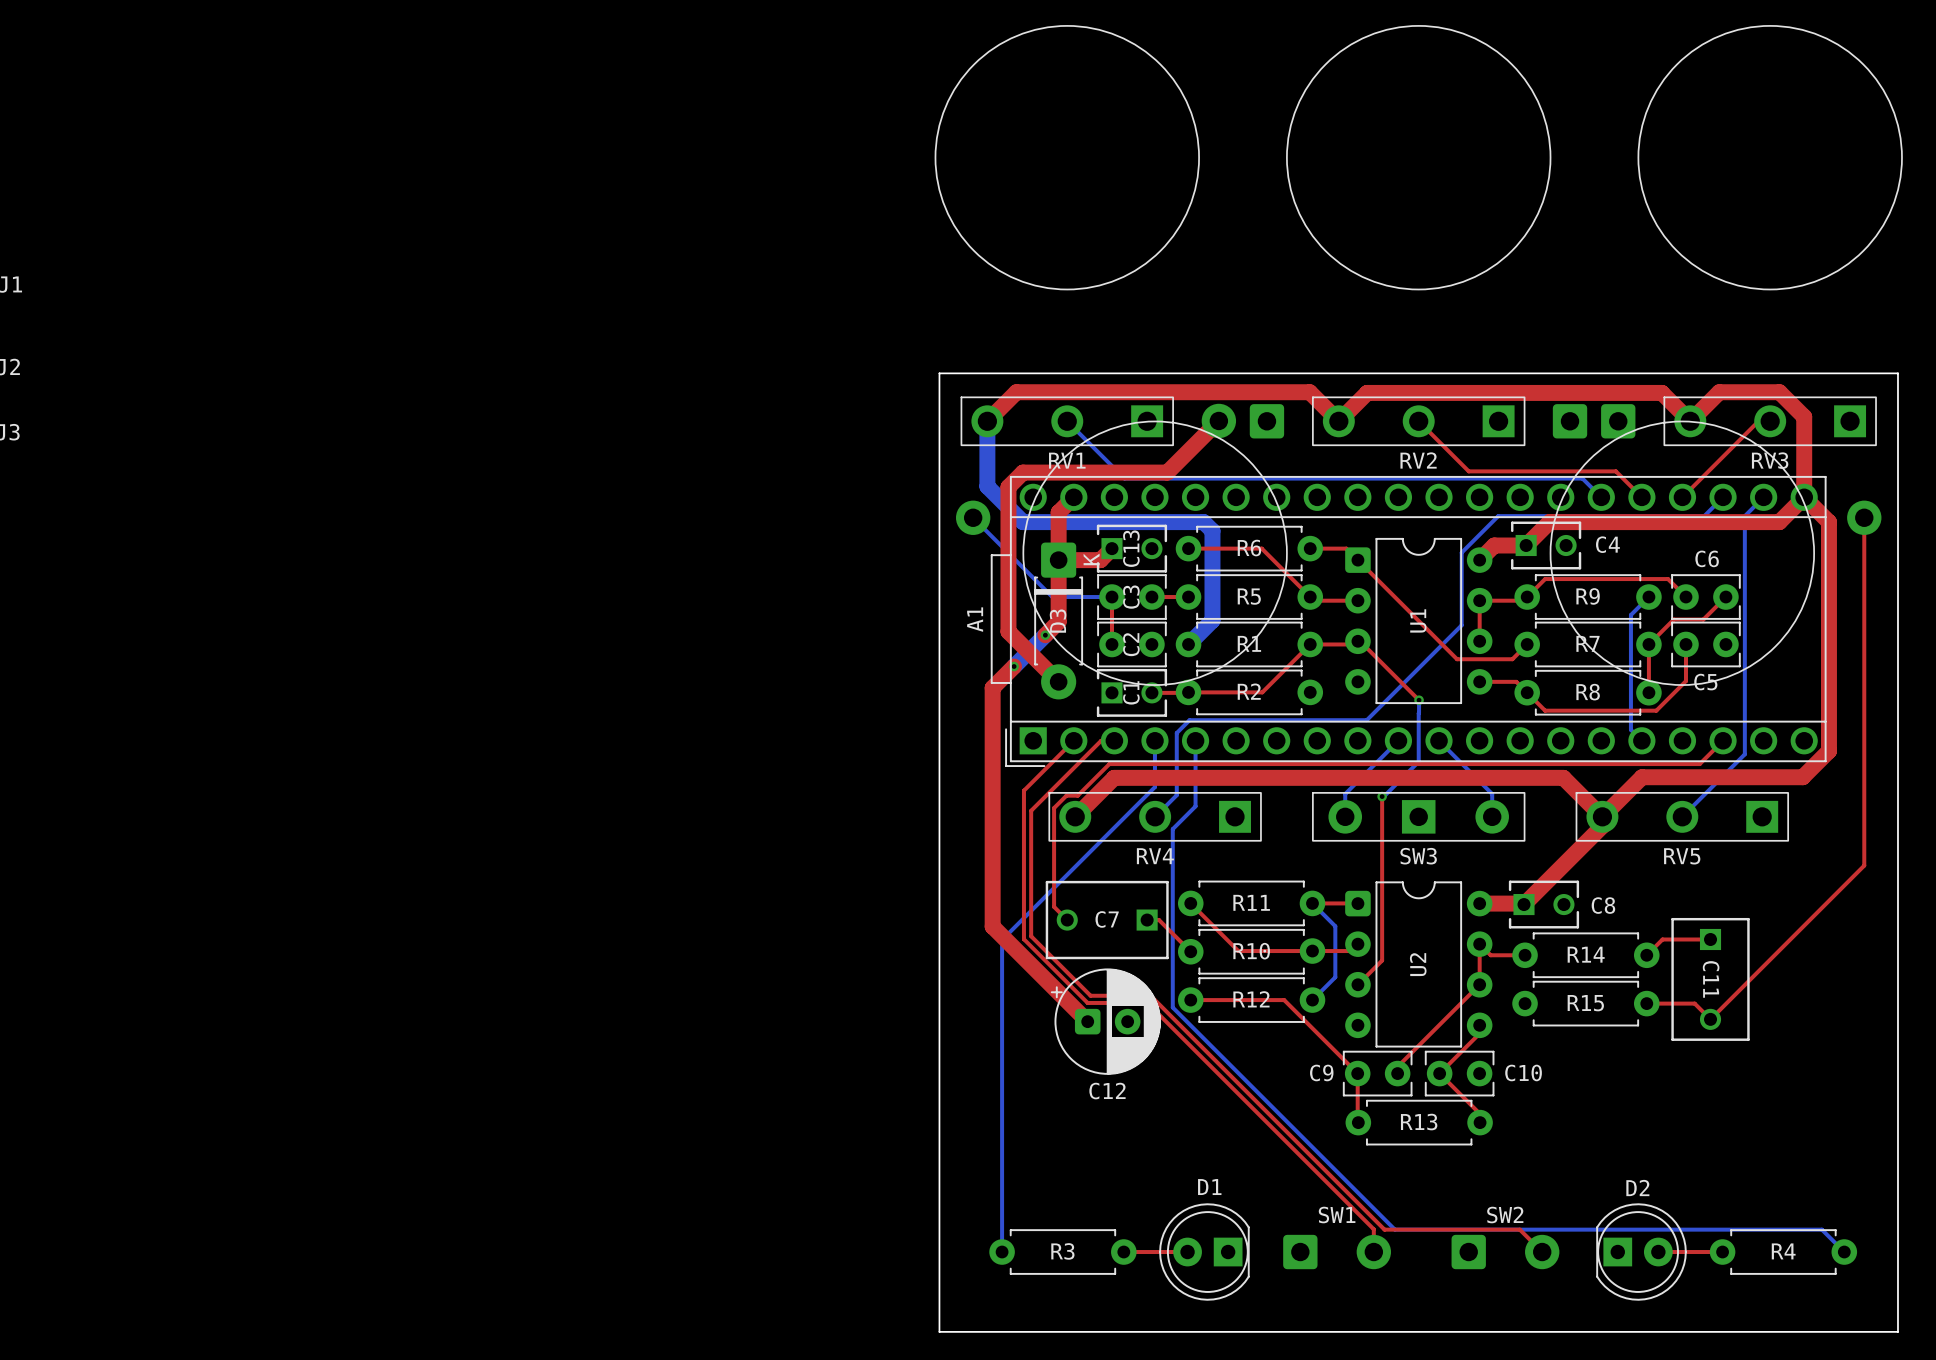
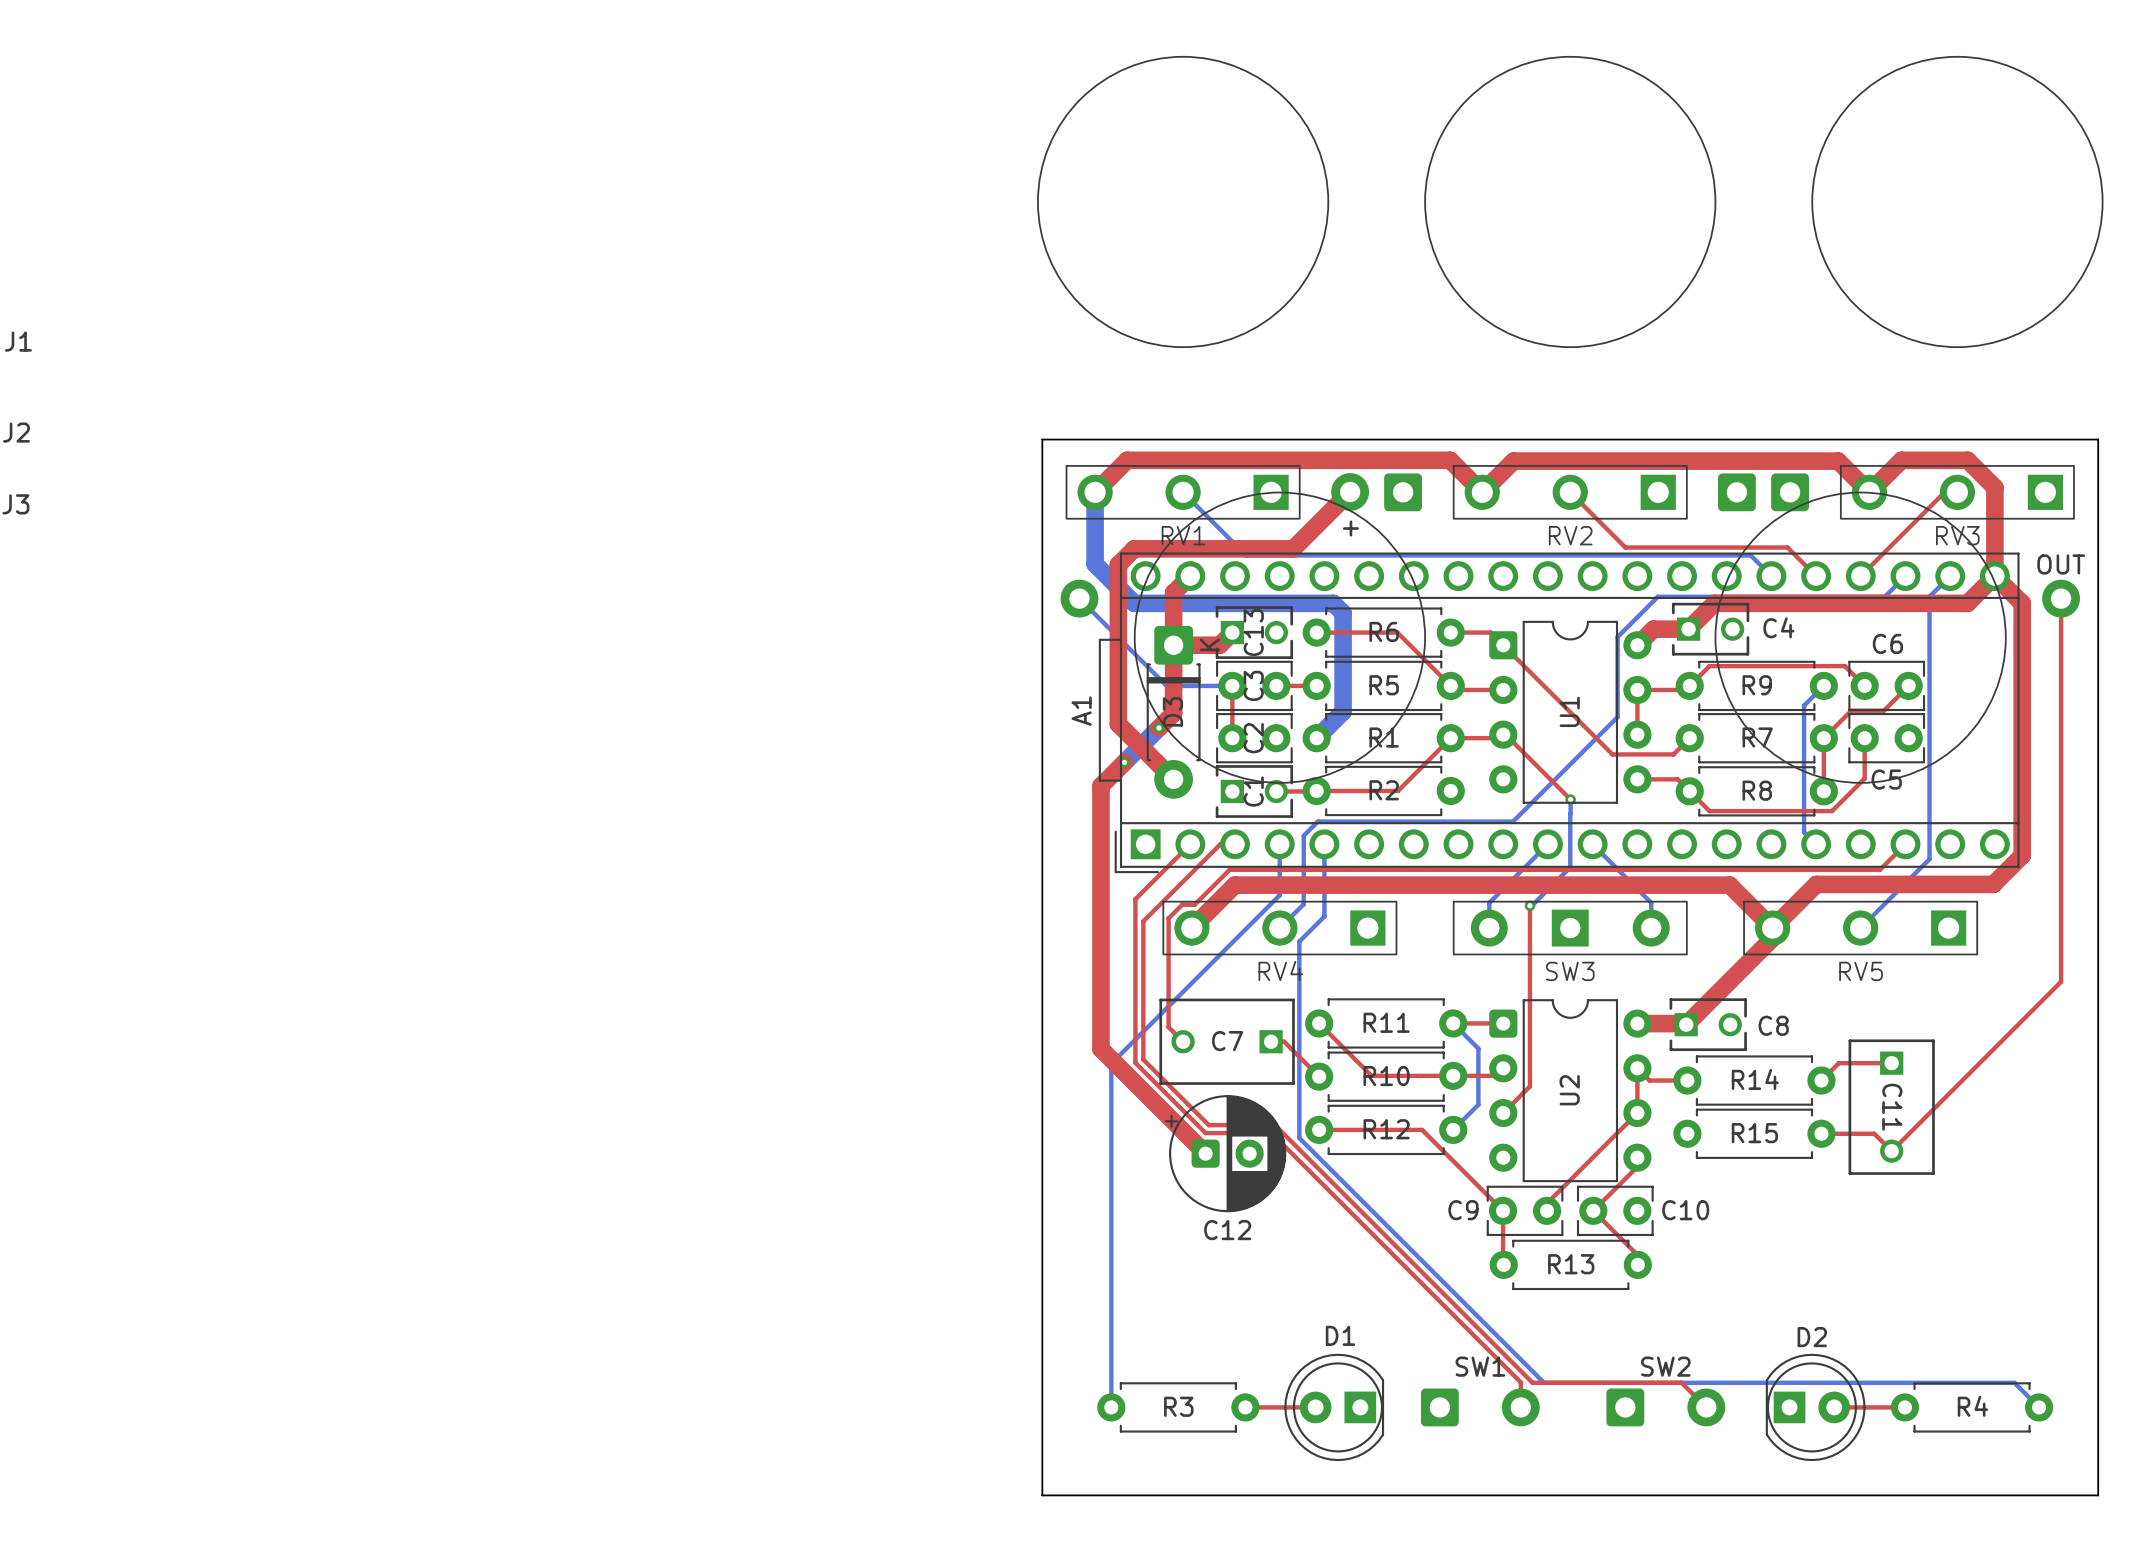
text: none -> + (1350, 528)
text: none -> OUT (2061, 564)

